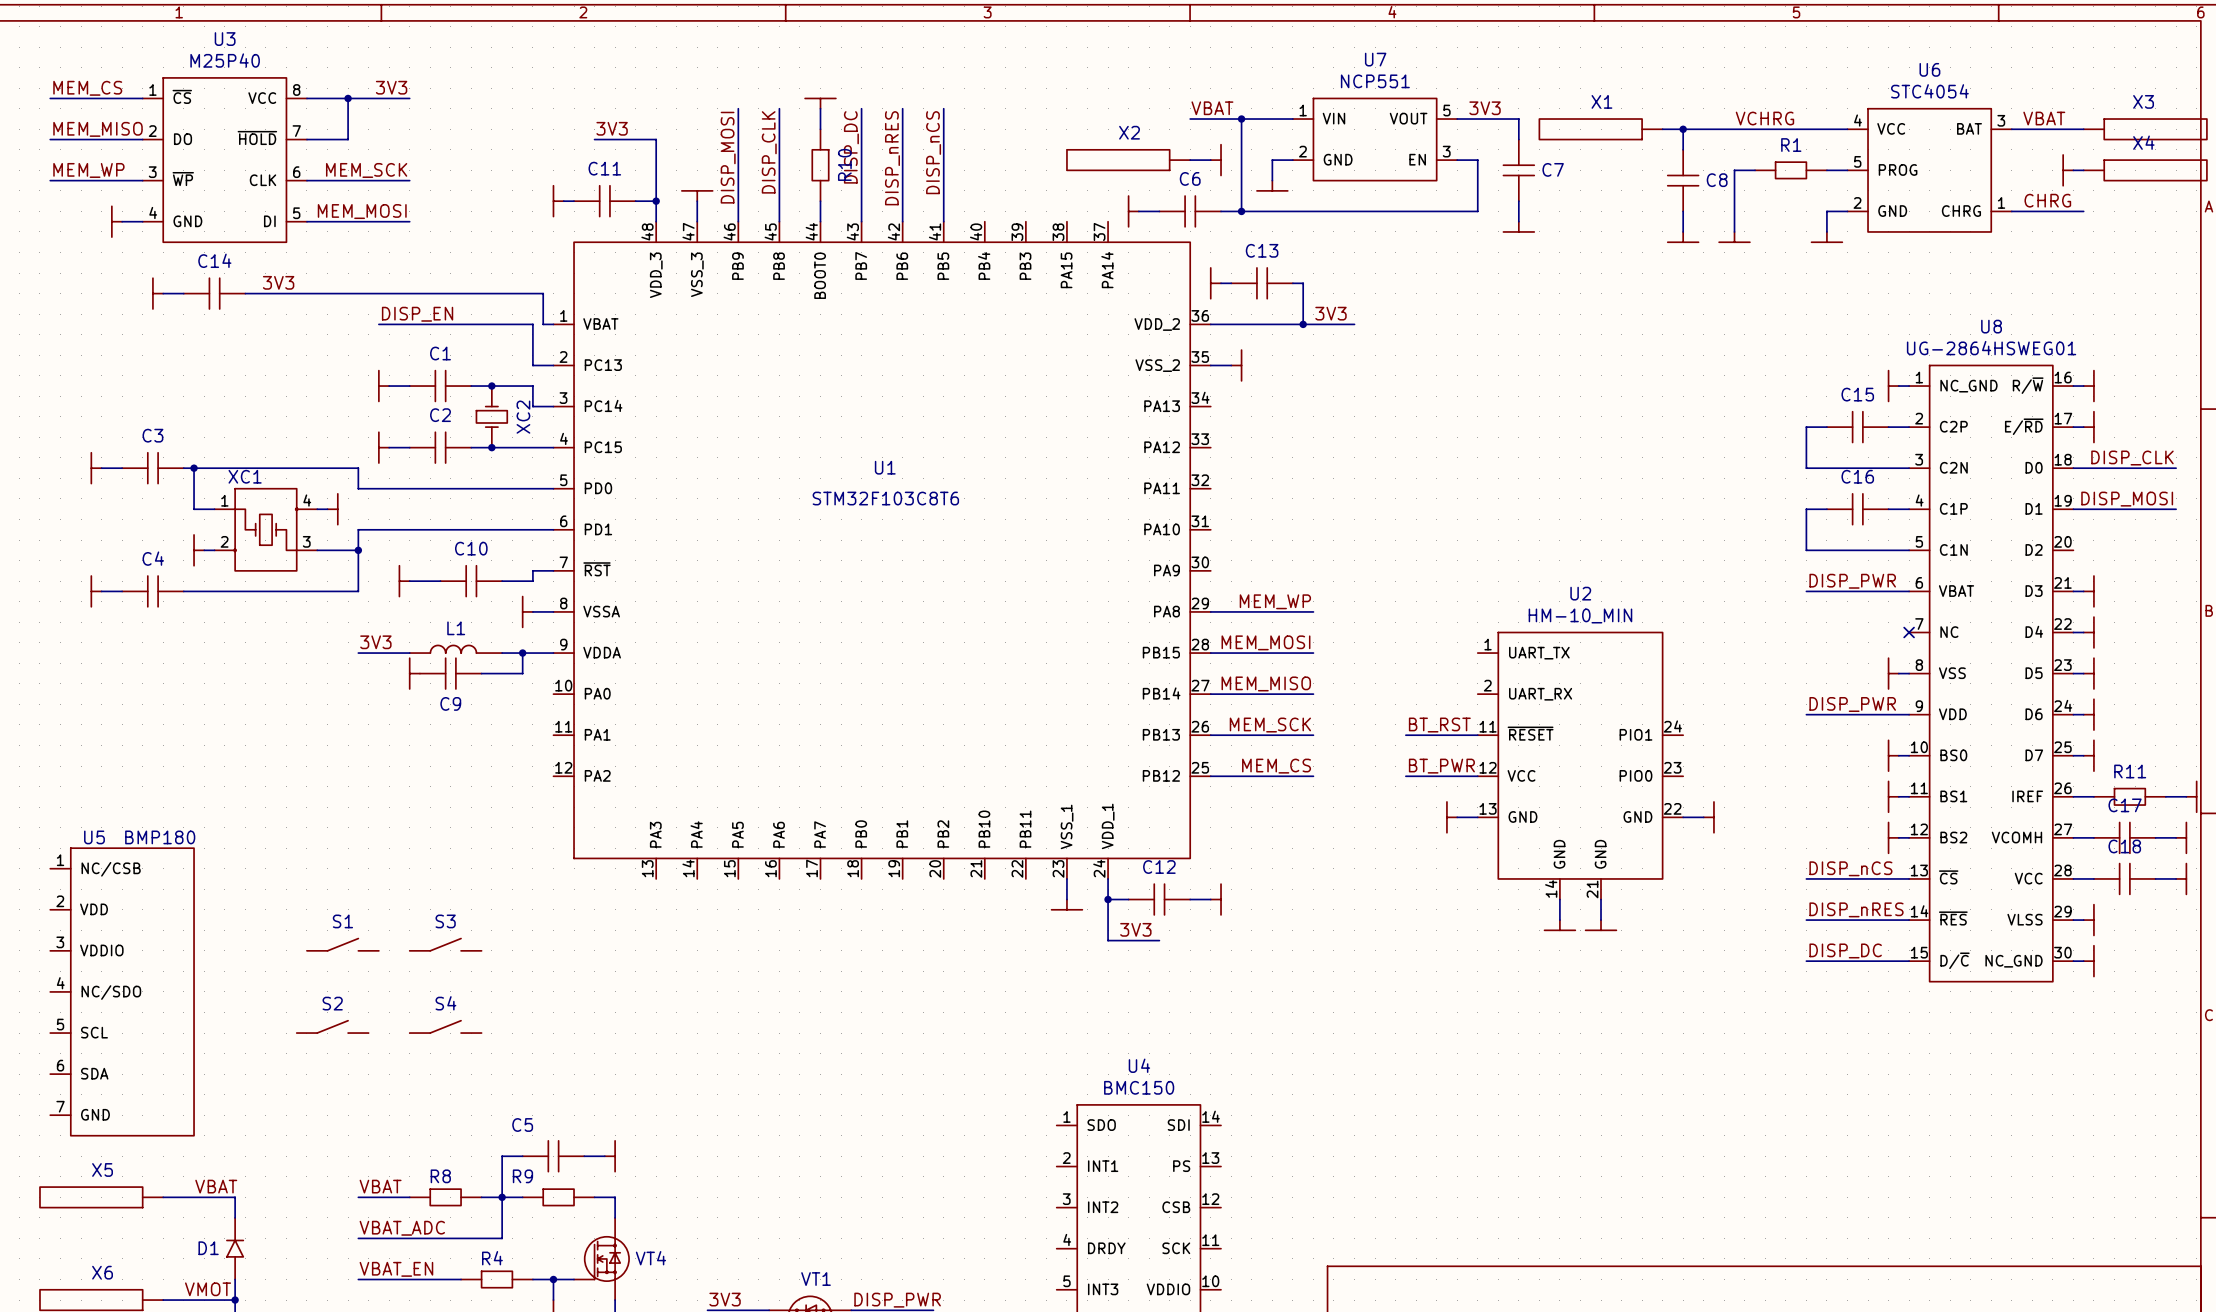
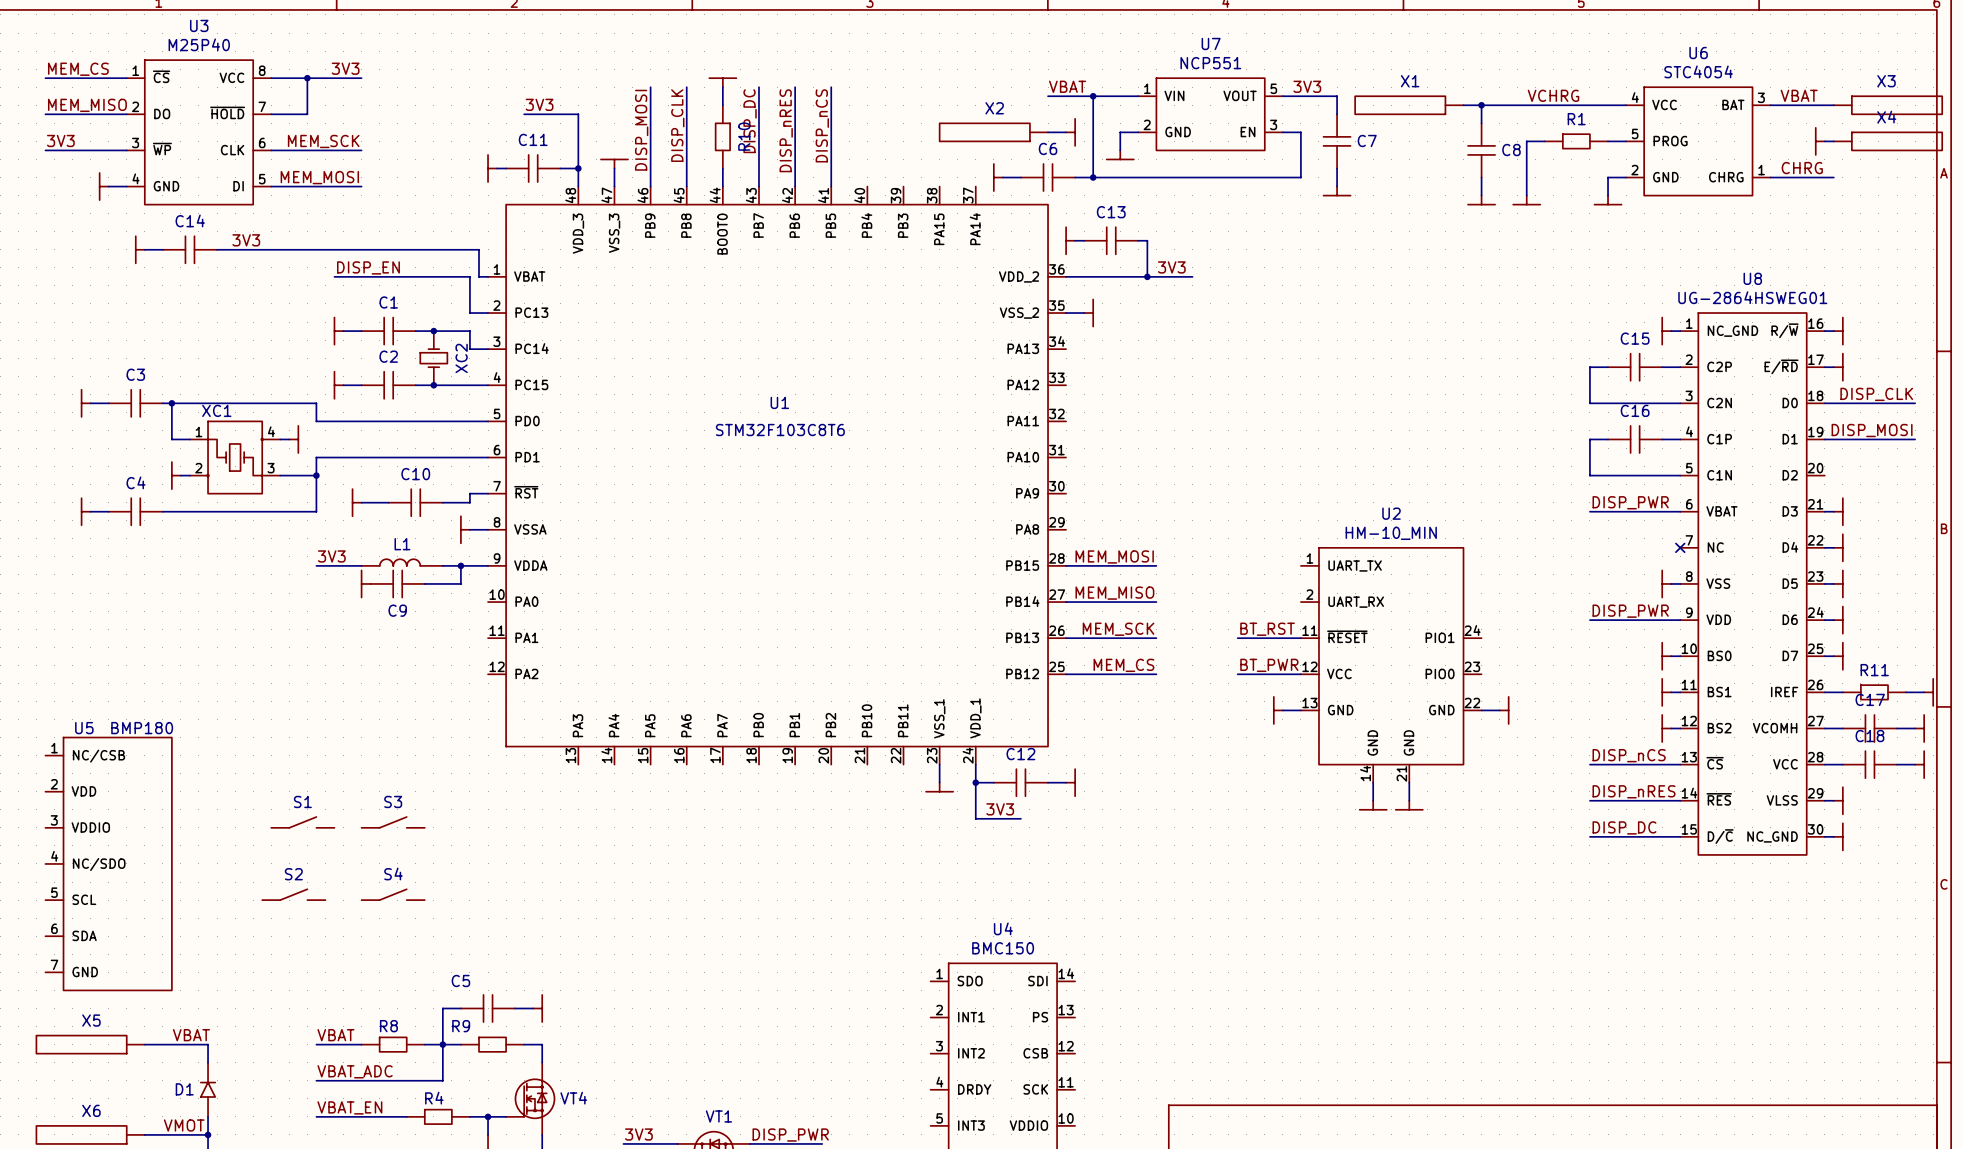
label: MEM_WP (88, 170) -> 3V3 (60, 140)
label: MEM_WP (1275, 601) -> none
wire: (1210, 611) (1313, 611) -> none

